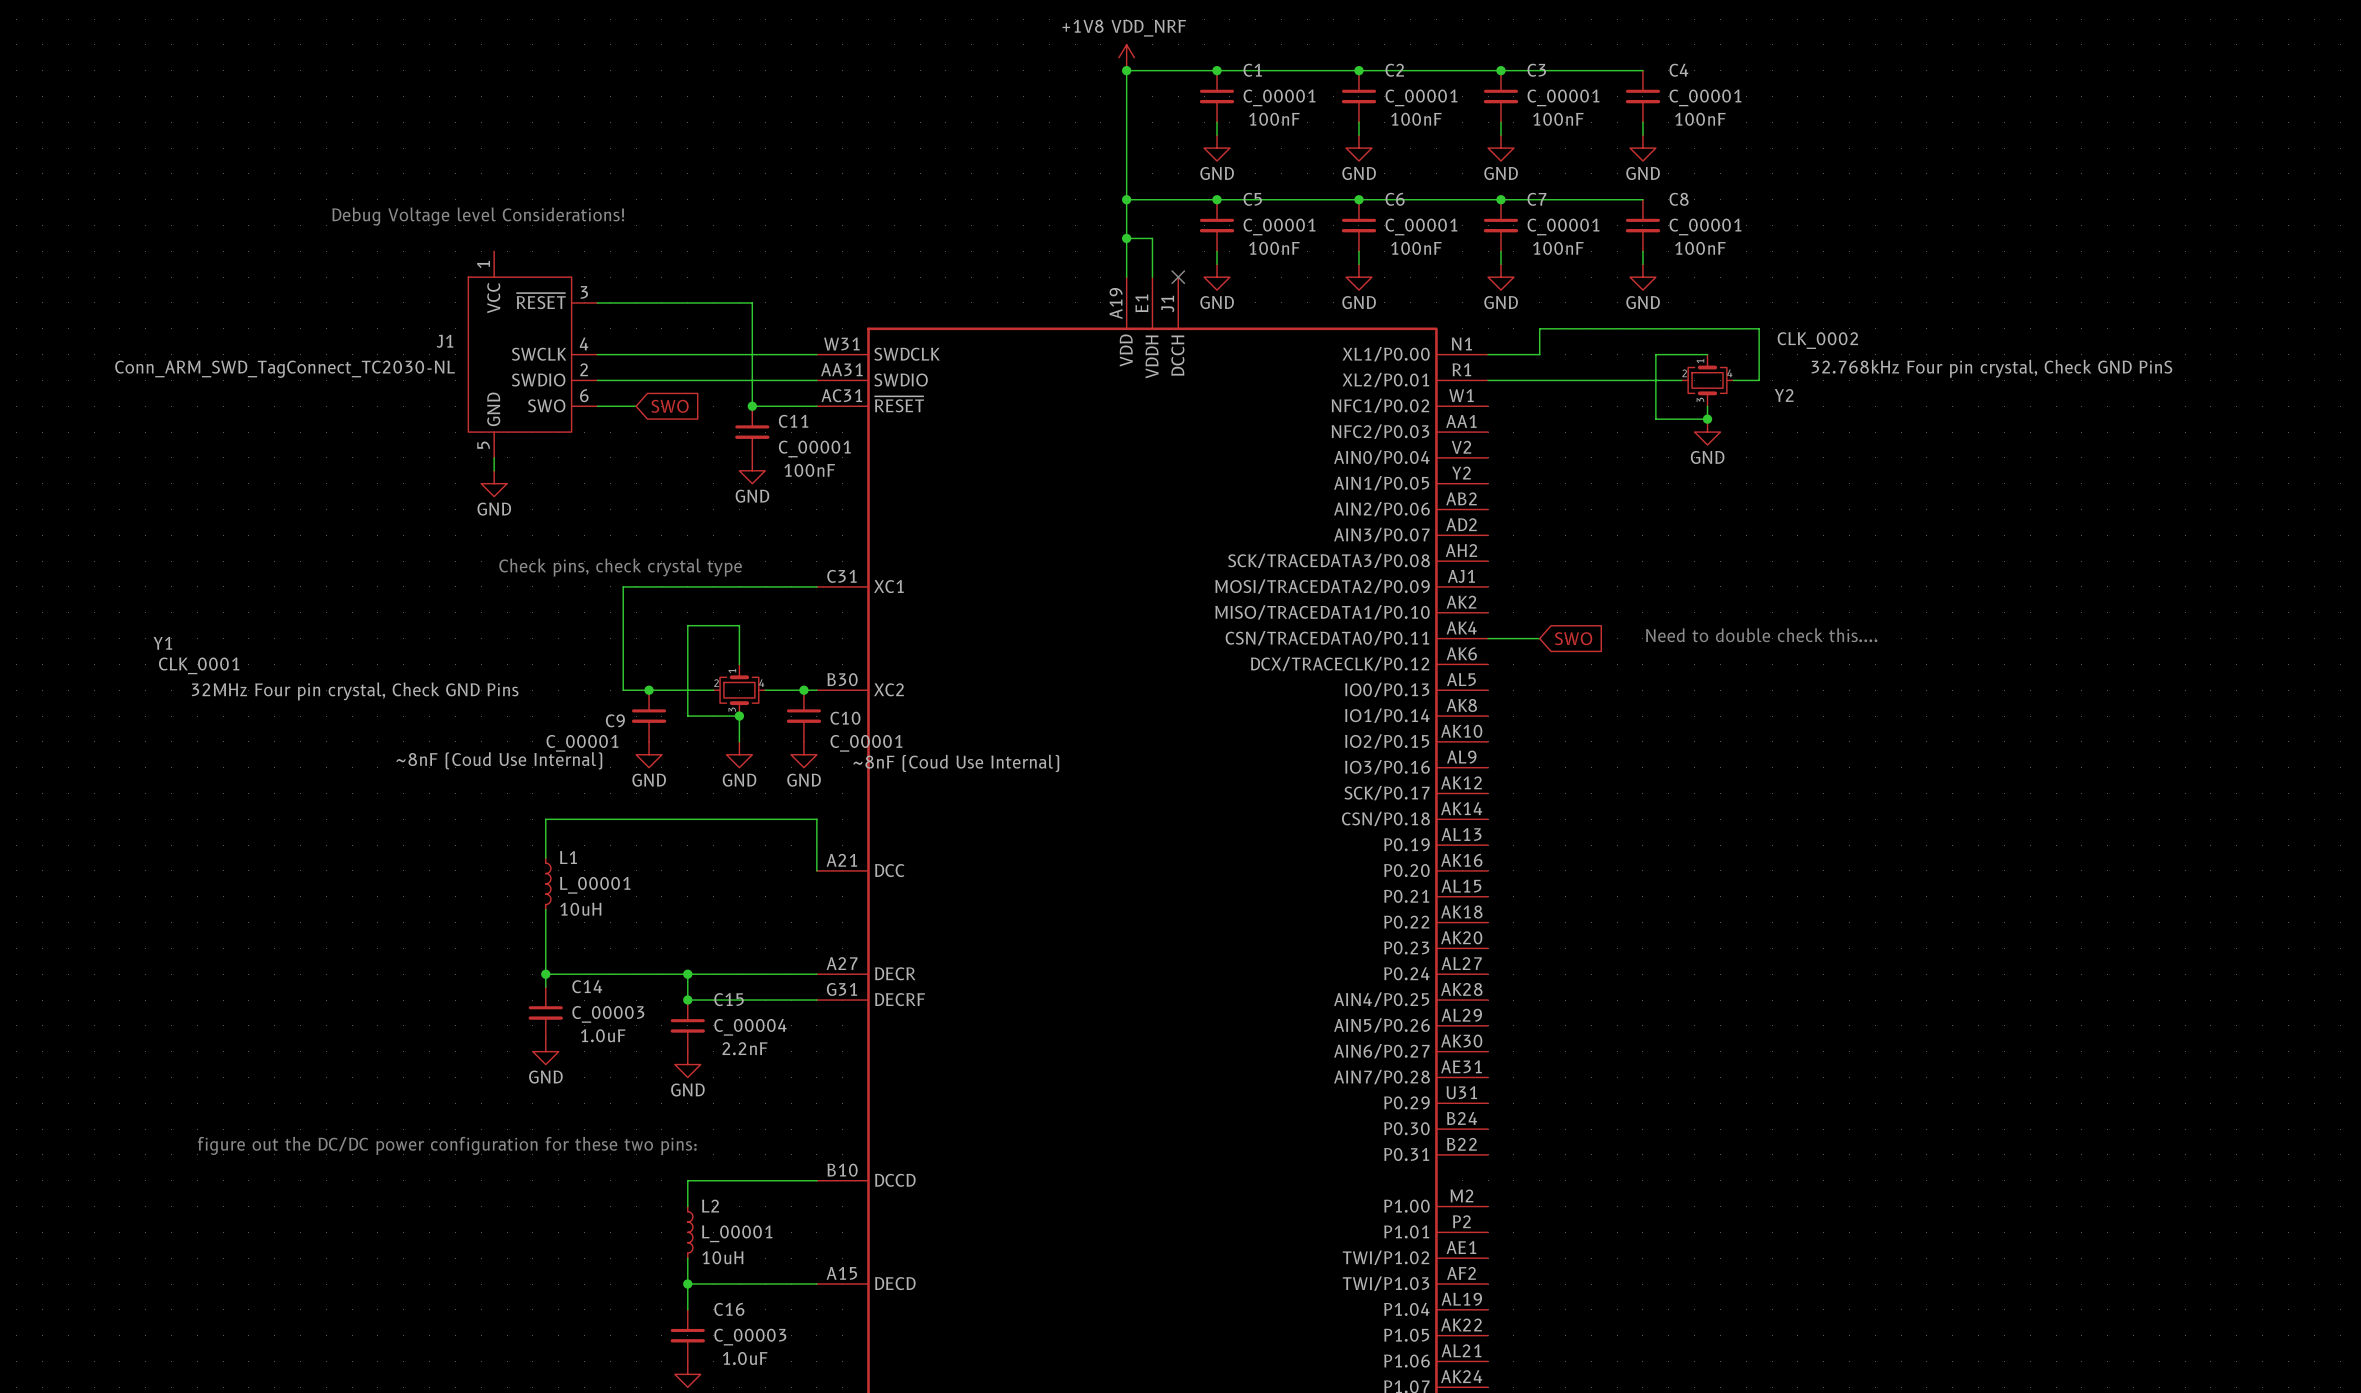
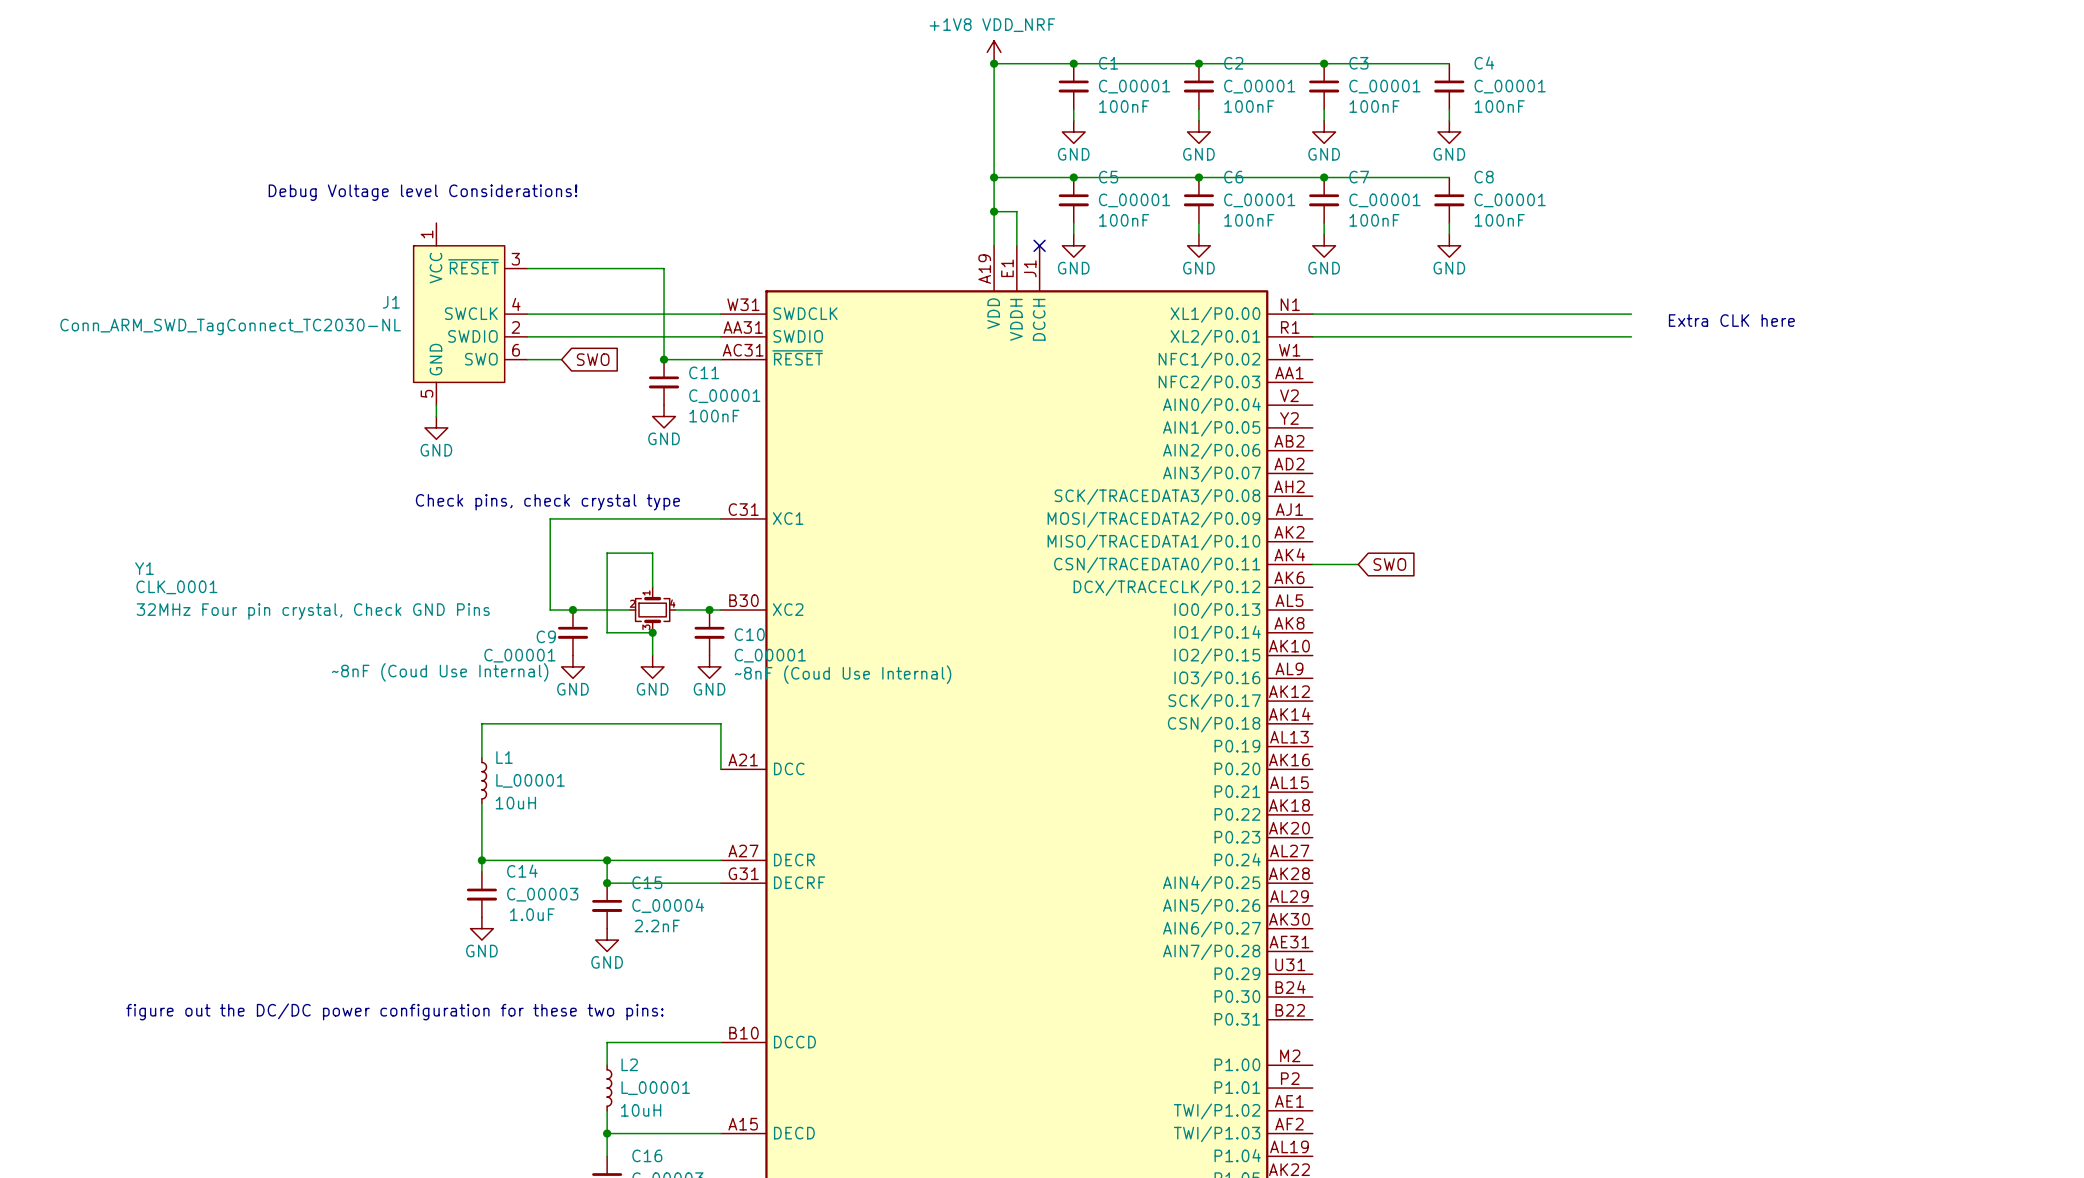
wire: (1539, 354) (1539, 328) (1759, 328) (1759, 380) -> (1358, 314) (1460, 314)
wire: (1655, 354) (1655, 419) (1707, 419) (1707, 406) -> none
wire: none -> (1506, 314) (1631, 314)
text: none -> Extra CLK here (1731, 320)
wire: none -> (1483, 336) (1529, 336)
Y2: CLK_0002 (1707, 380) -> none
wire: none -> (1551, 336) (1631, 336)
junction: (1707, 419) -> none
power symbol: GND (1707, 432) -> none
text: Need to double check this.... (1761, 635) -> none

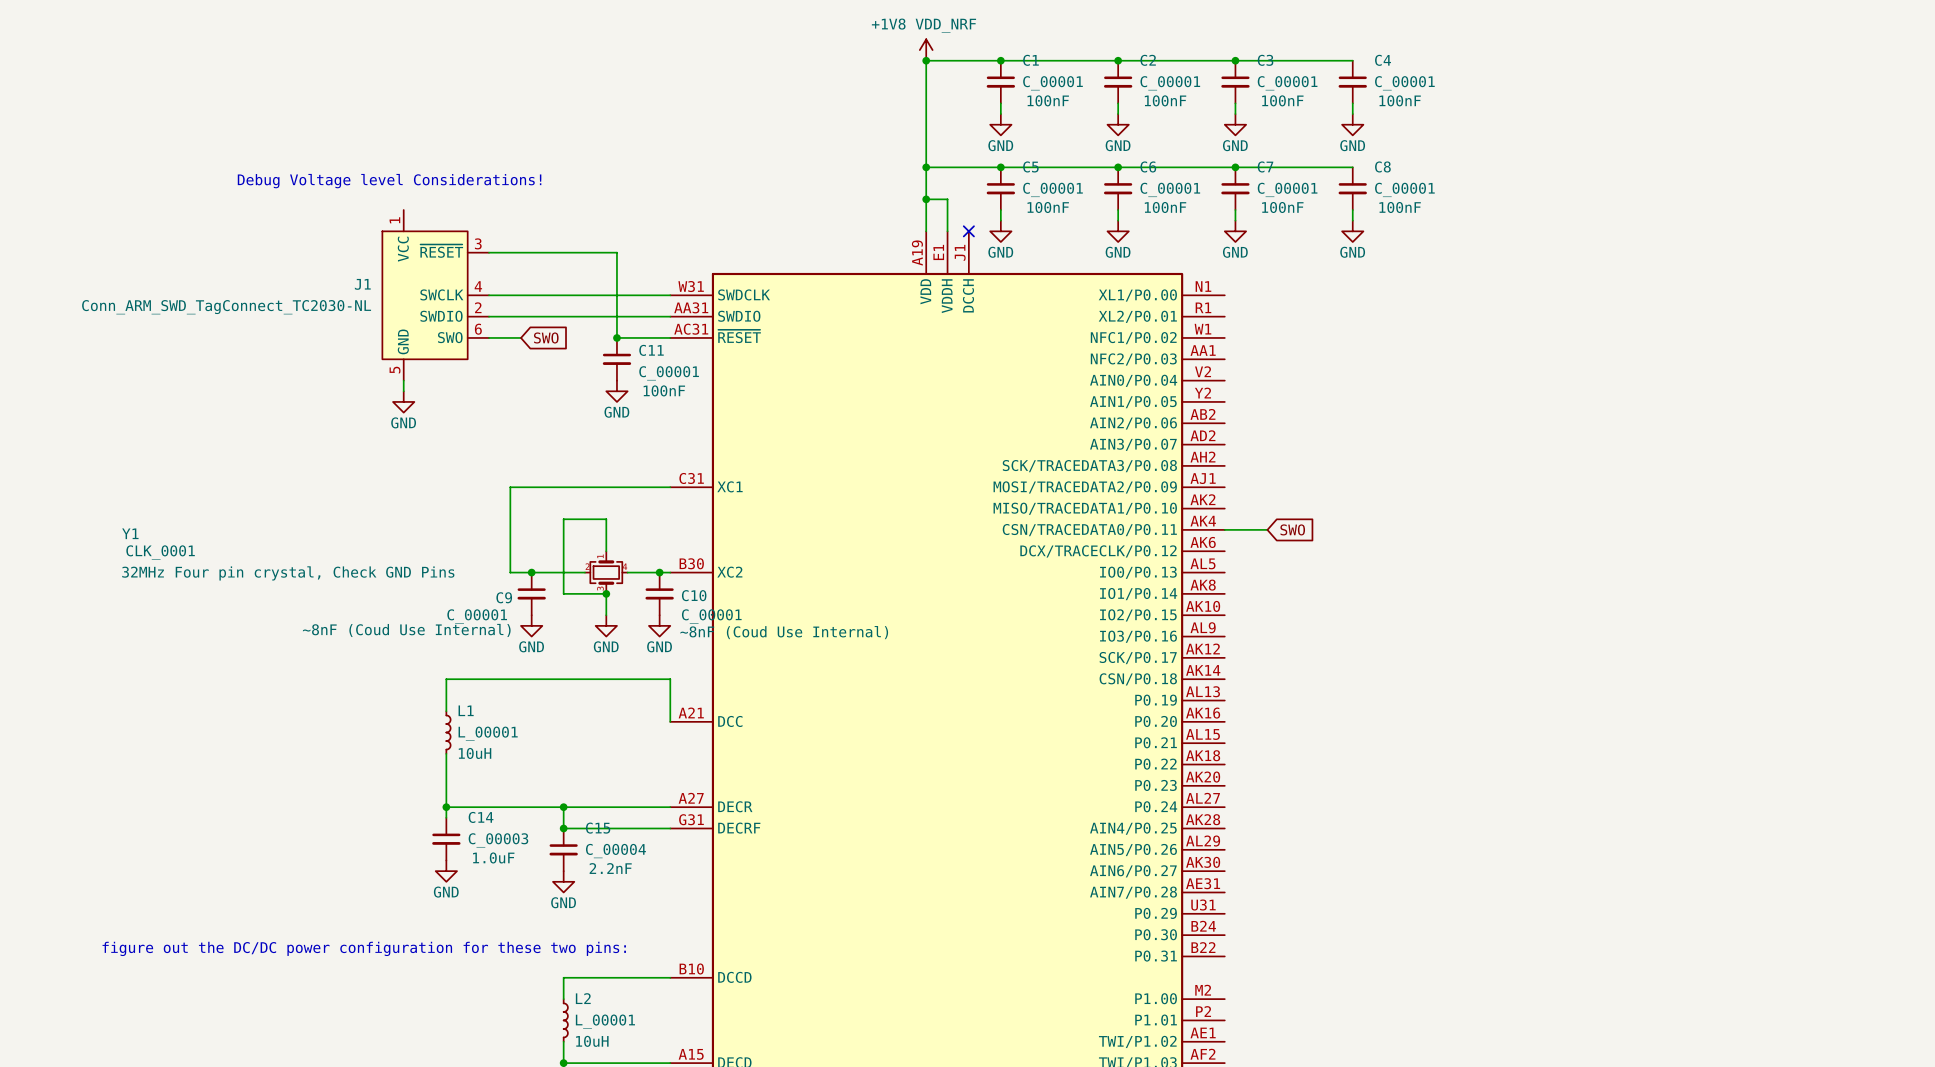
wire: (1312, 314) (1631, 314) -> none
text: Extra CLK here (1731, 320) -> none
wire: (1312, 336) (1631, 336) -> none
text: Check pins, check crystal type (547, 502) -> none

